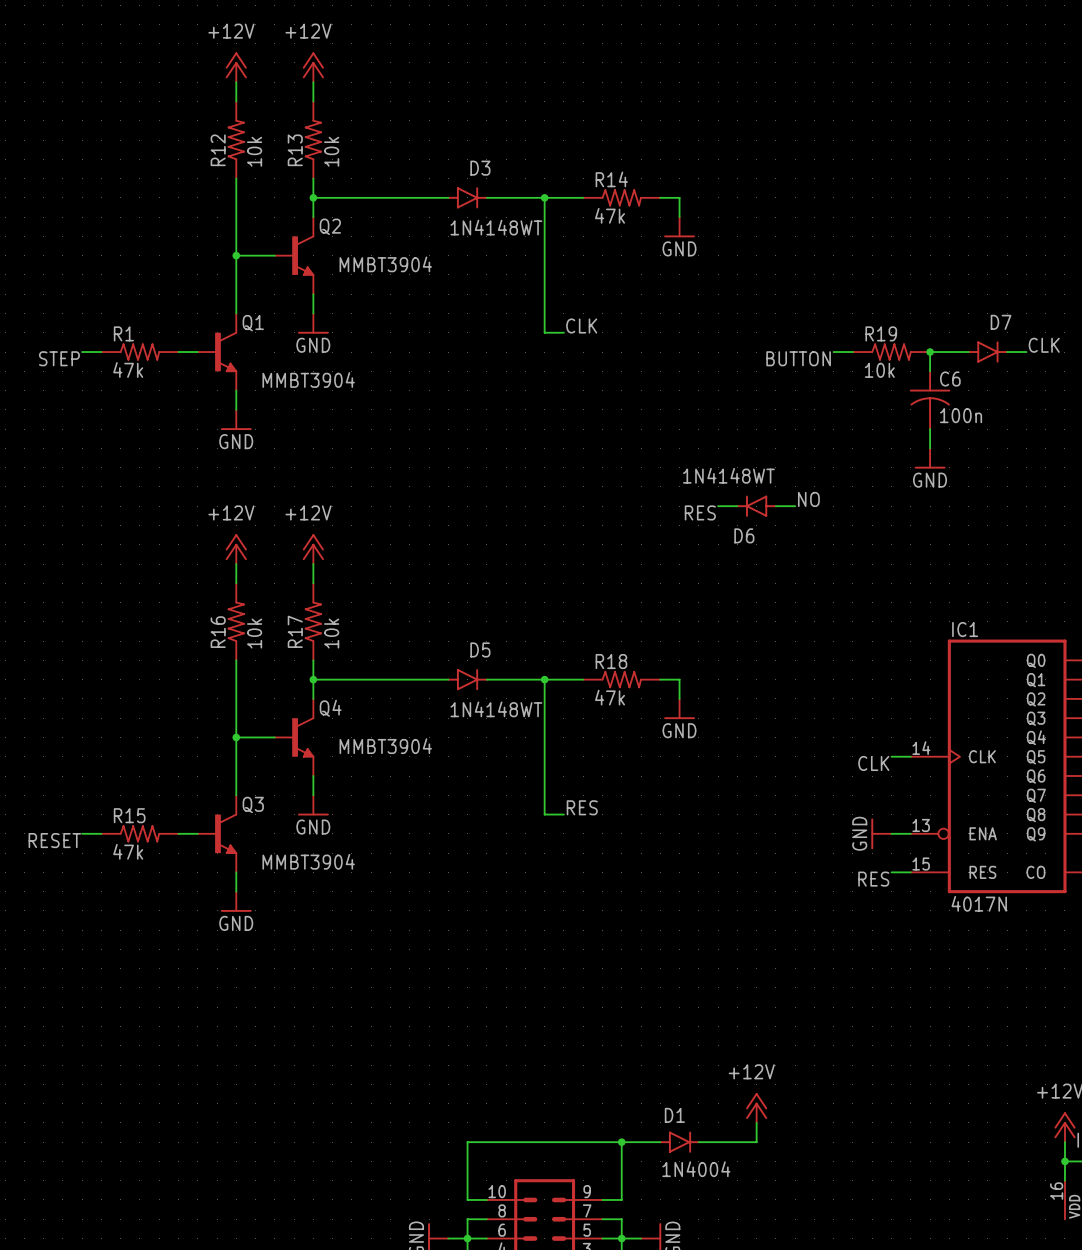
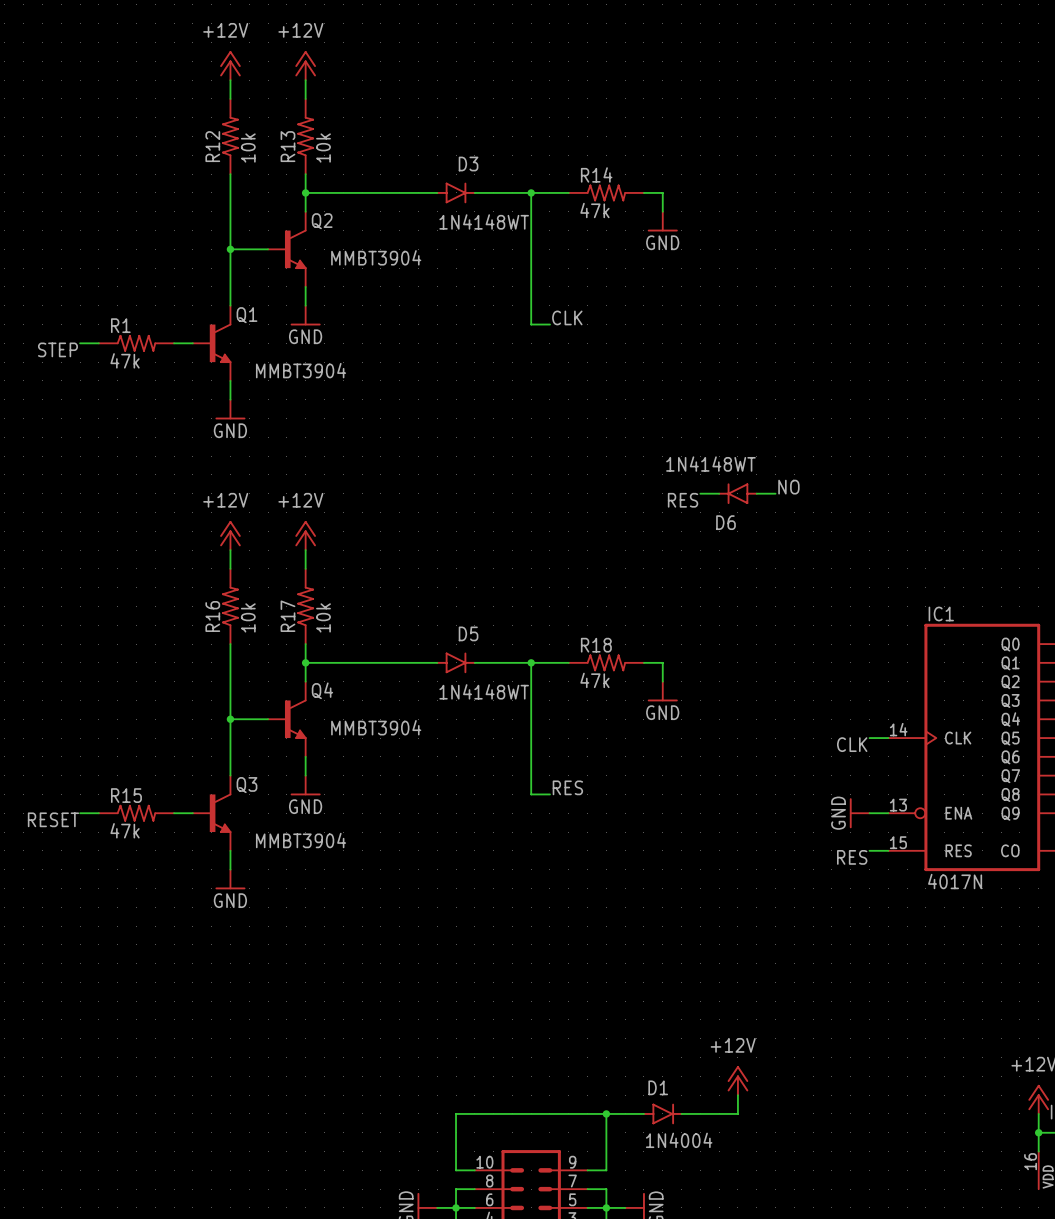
label: CLK (1044, 345) -> none
wire: (833, 352) (852, 352) -> none
R19: 10k (891, 352) -> none
junction: (930, 352) -> none
wire: (968, 352) (930, 352) (930, 371) -> none
D7: (987, 352) -> none
wire: (1007, 352) (1026, 352) -> none
label: BUTTON (798, 358) -> none
C6: 100n (930, 400) -> none
wire: (930, 429) (930, 448) -> none
power symbol: GND (930, 458) -> none

